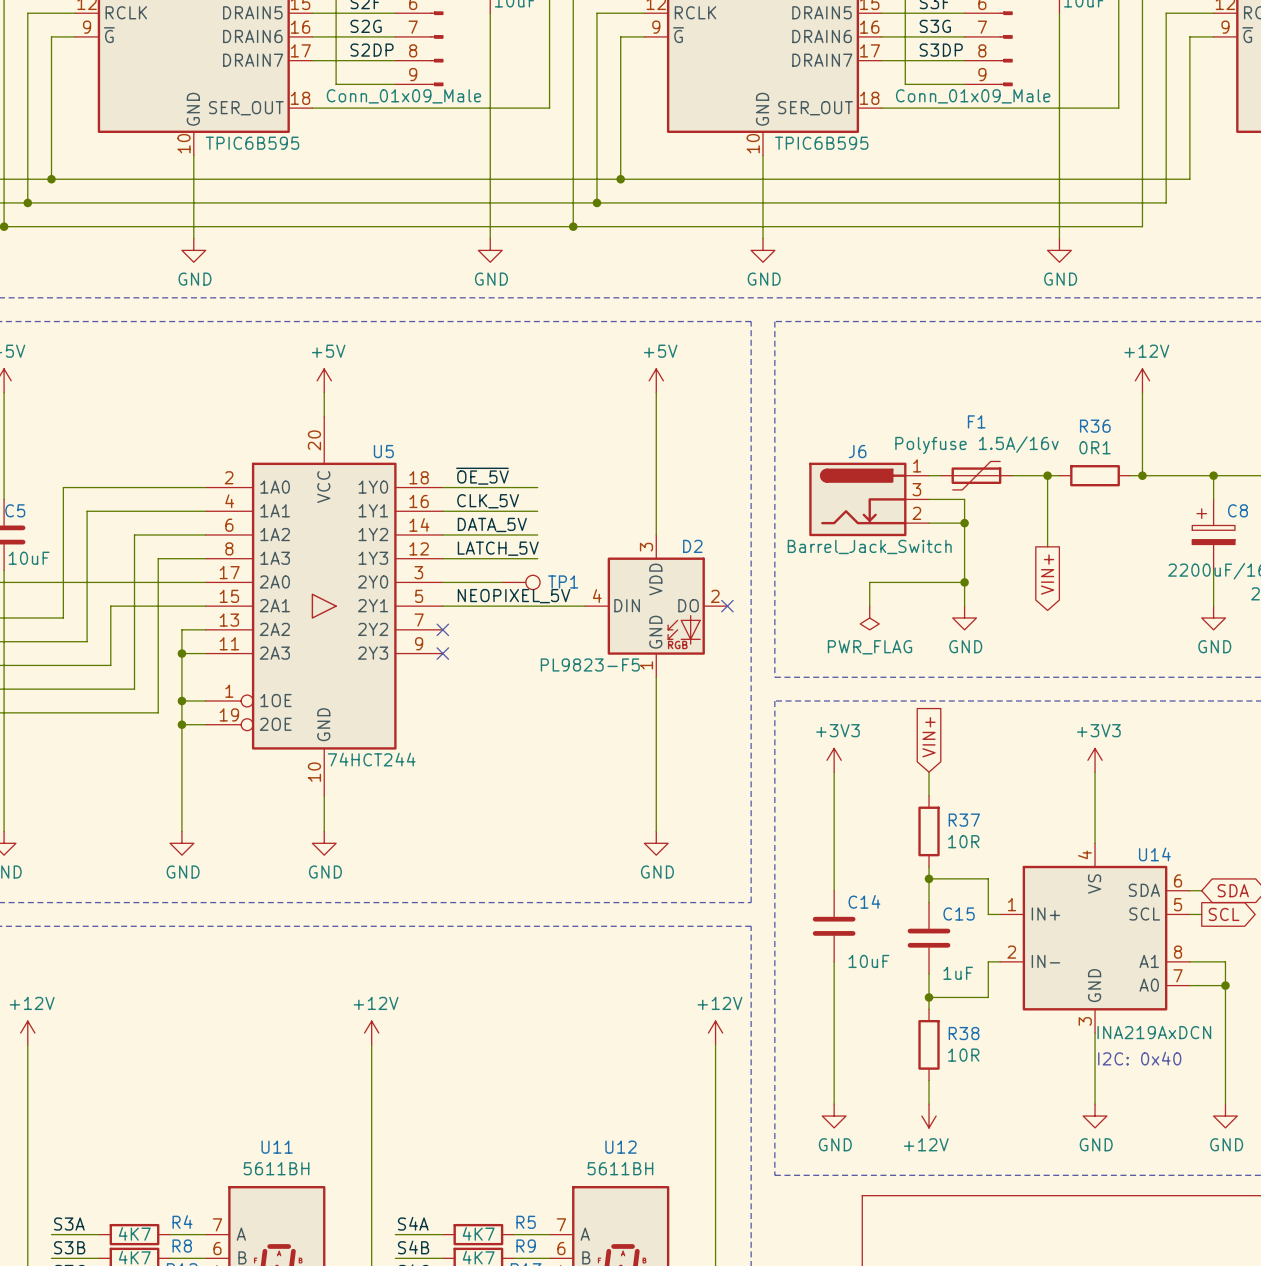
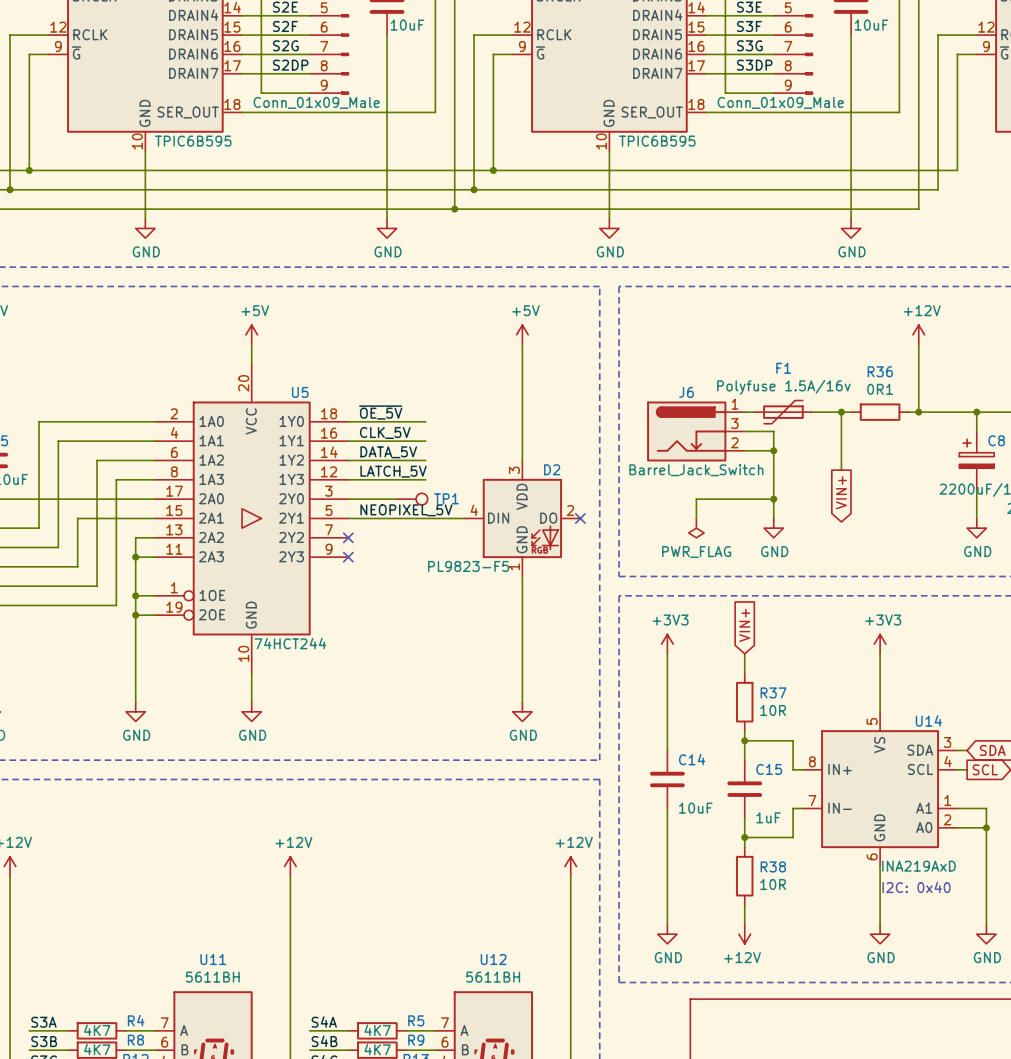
U14 pin number: 4 (1084, 854) -> 5 (872, 721)
U14 pin number: 6 (1178, 880) -> 3 (947, 742)
U14 pin number: 1 (1012, 904) -> 8 (812, 761)
U14 pin number: 5 (1178, 904) -> 4 (947, 761)
U14 pin number: 2 (1011, 952) -> 7 (812, 800)
U14 pin number: 8 (1178, 952) -> 1 (947, 800)
U14 pin number: 7 (1178, 975) -> 2 (947, 819)
U14 pin number: 3 (1085, 1021) -> 6 (872, 856)
U14 value: INA219AxDCN (1154, 1032) -> INA219AxD (918, 866)

